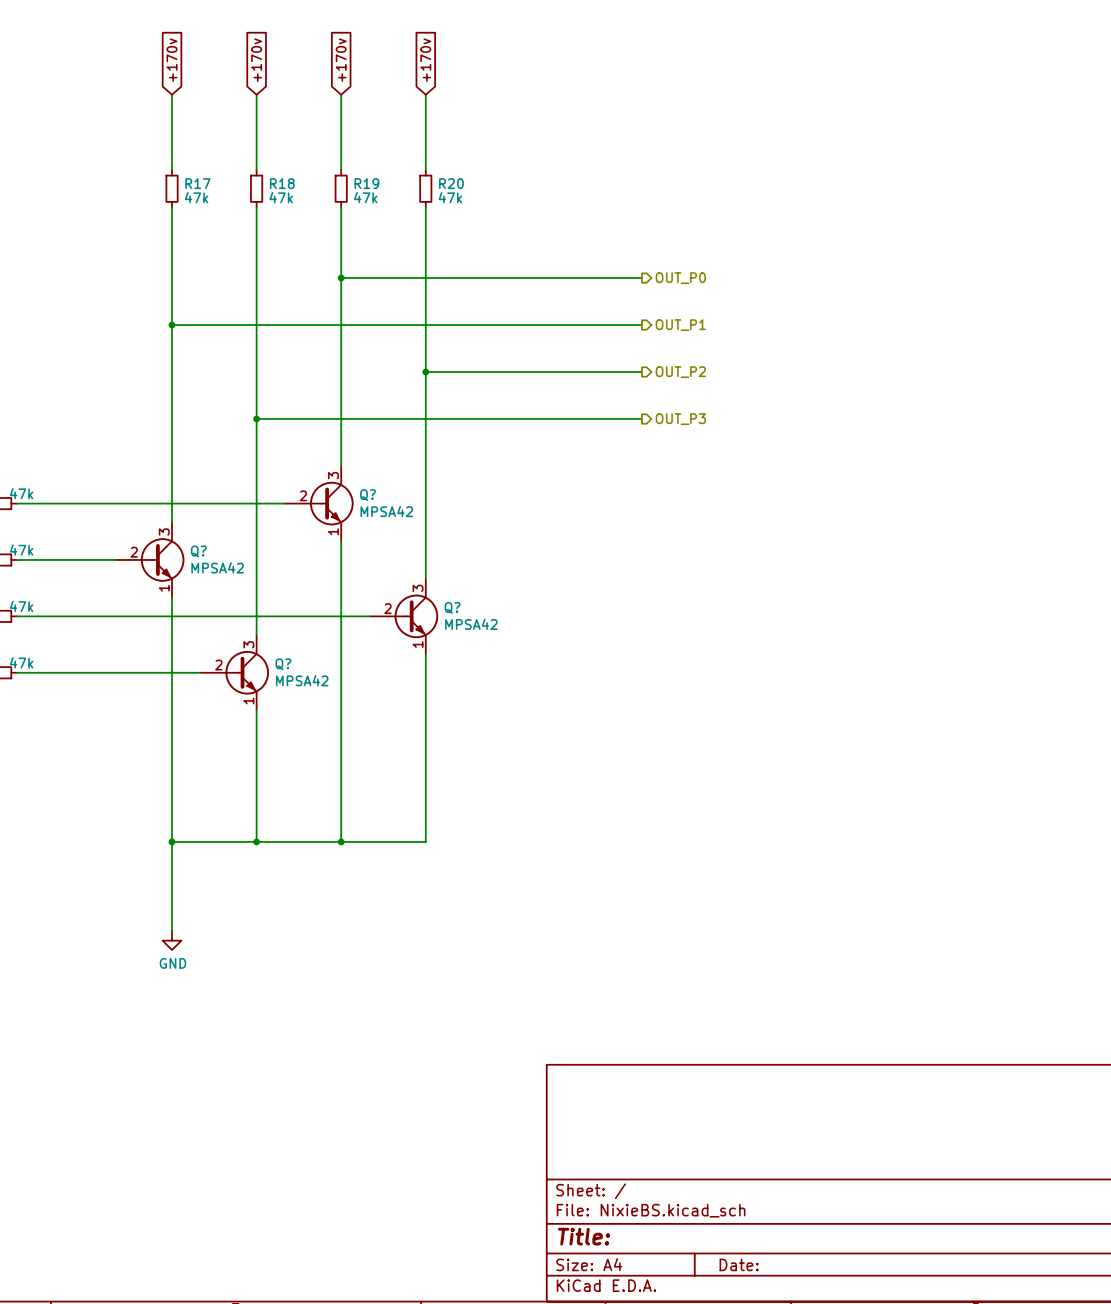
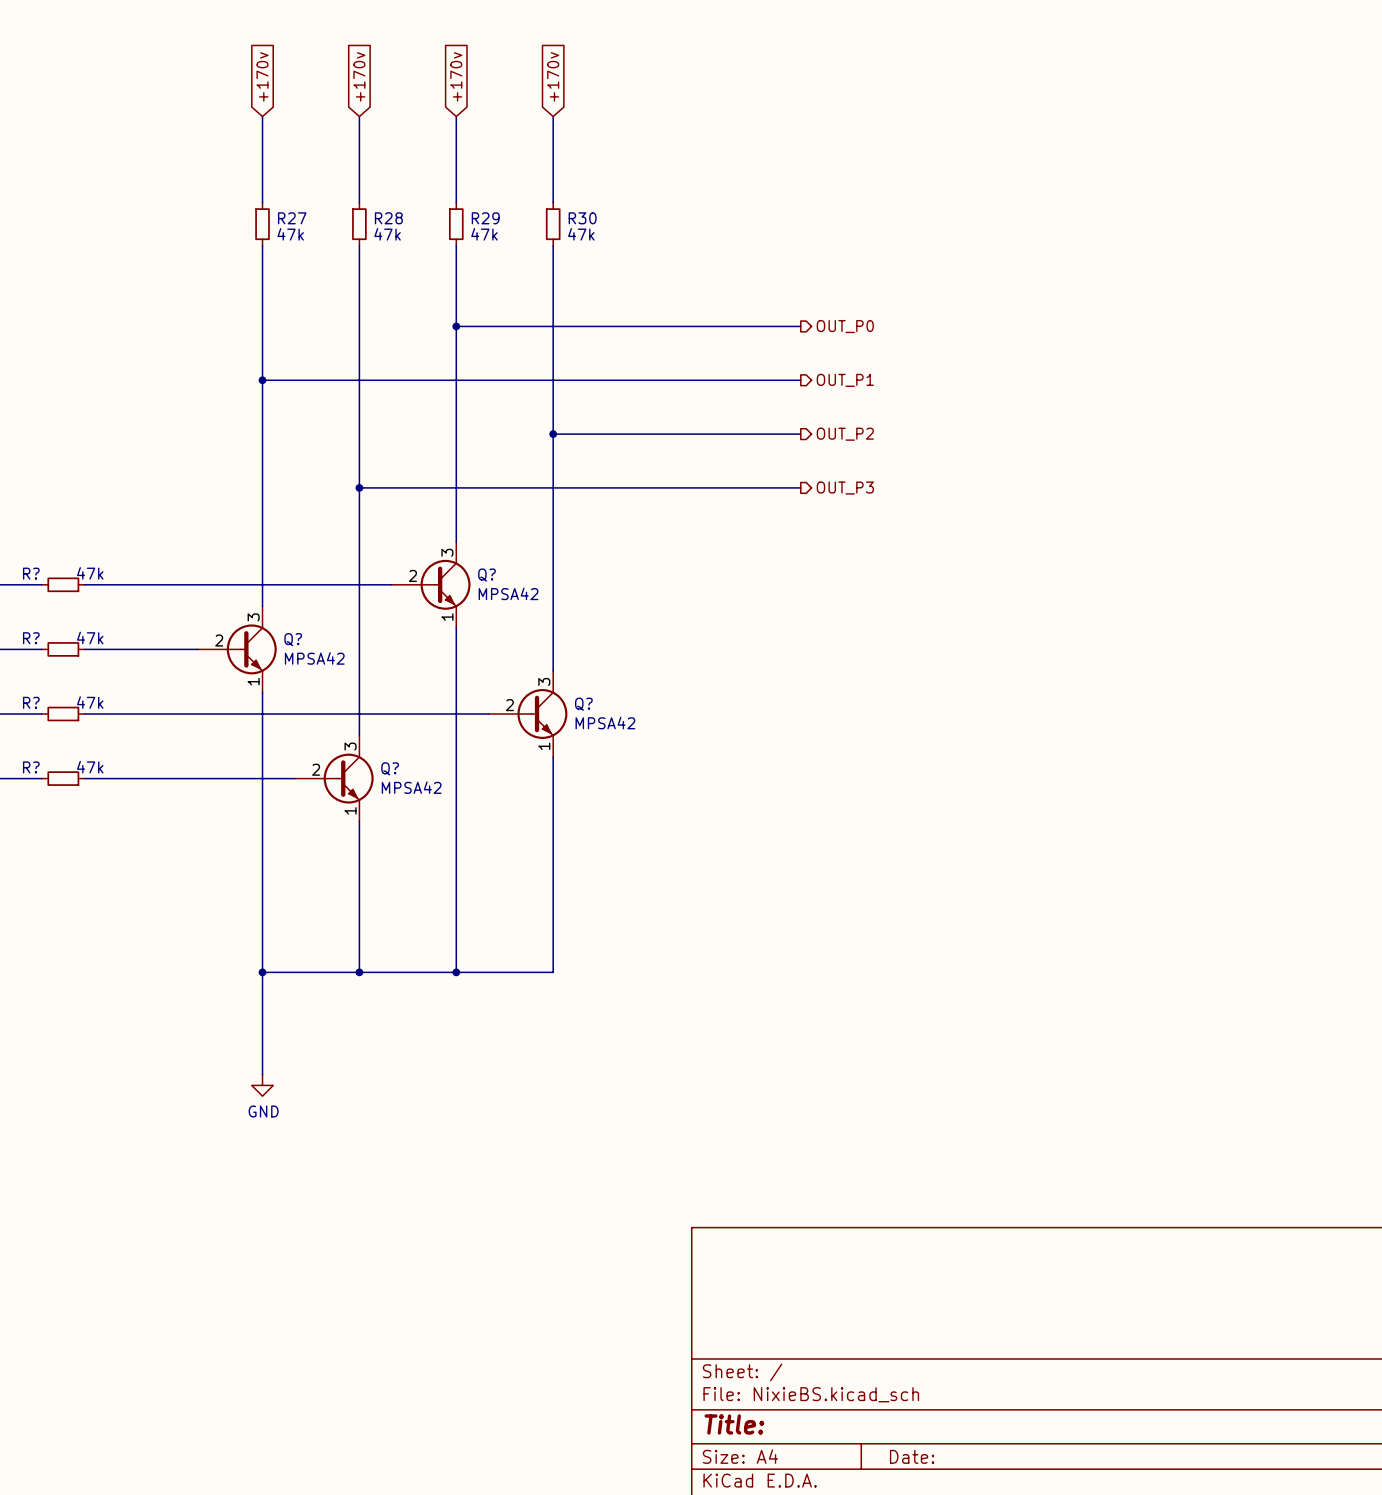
R17 name: R17 (197, 183) -> R27 (292, 218)
R18 name: R18 (282, 183) -> R28 (388, 218)
R19 name: R19 (366, 183) -> R29 (485, 218)
R20 name: R20 (451, 183) -> R30 (582, 218)

